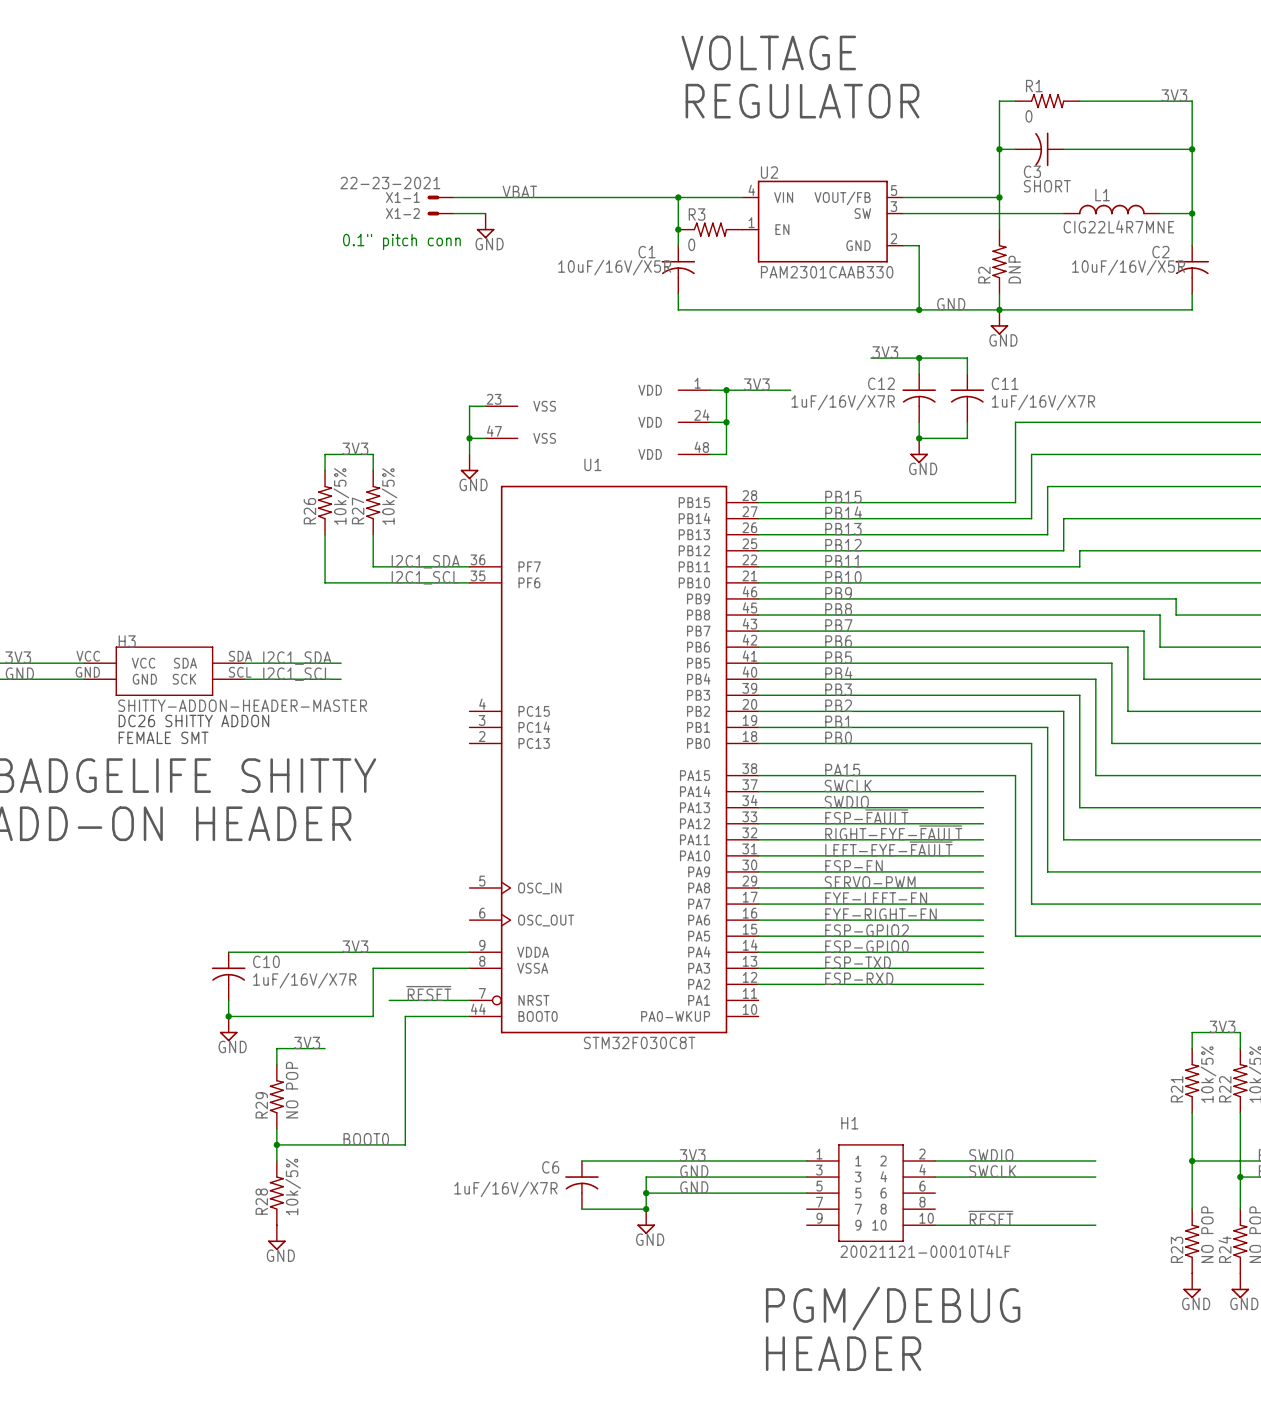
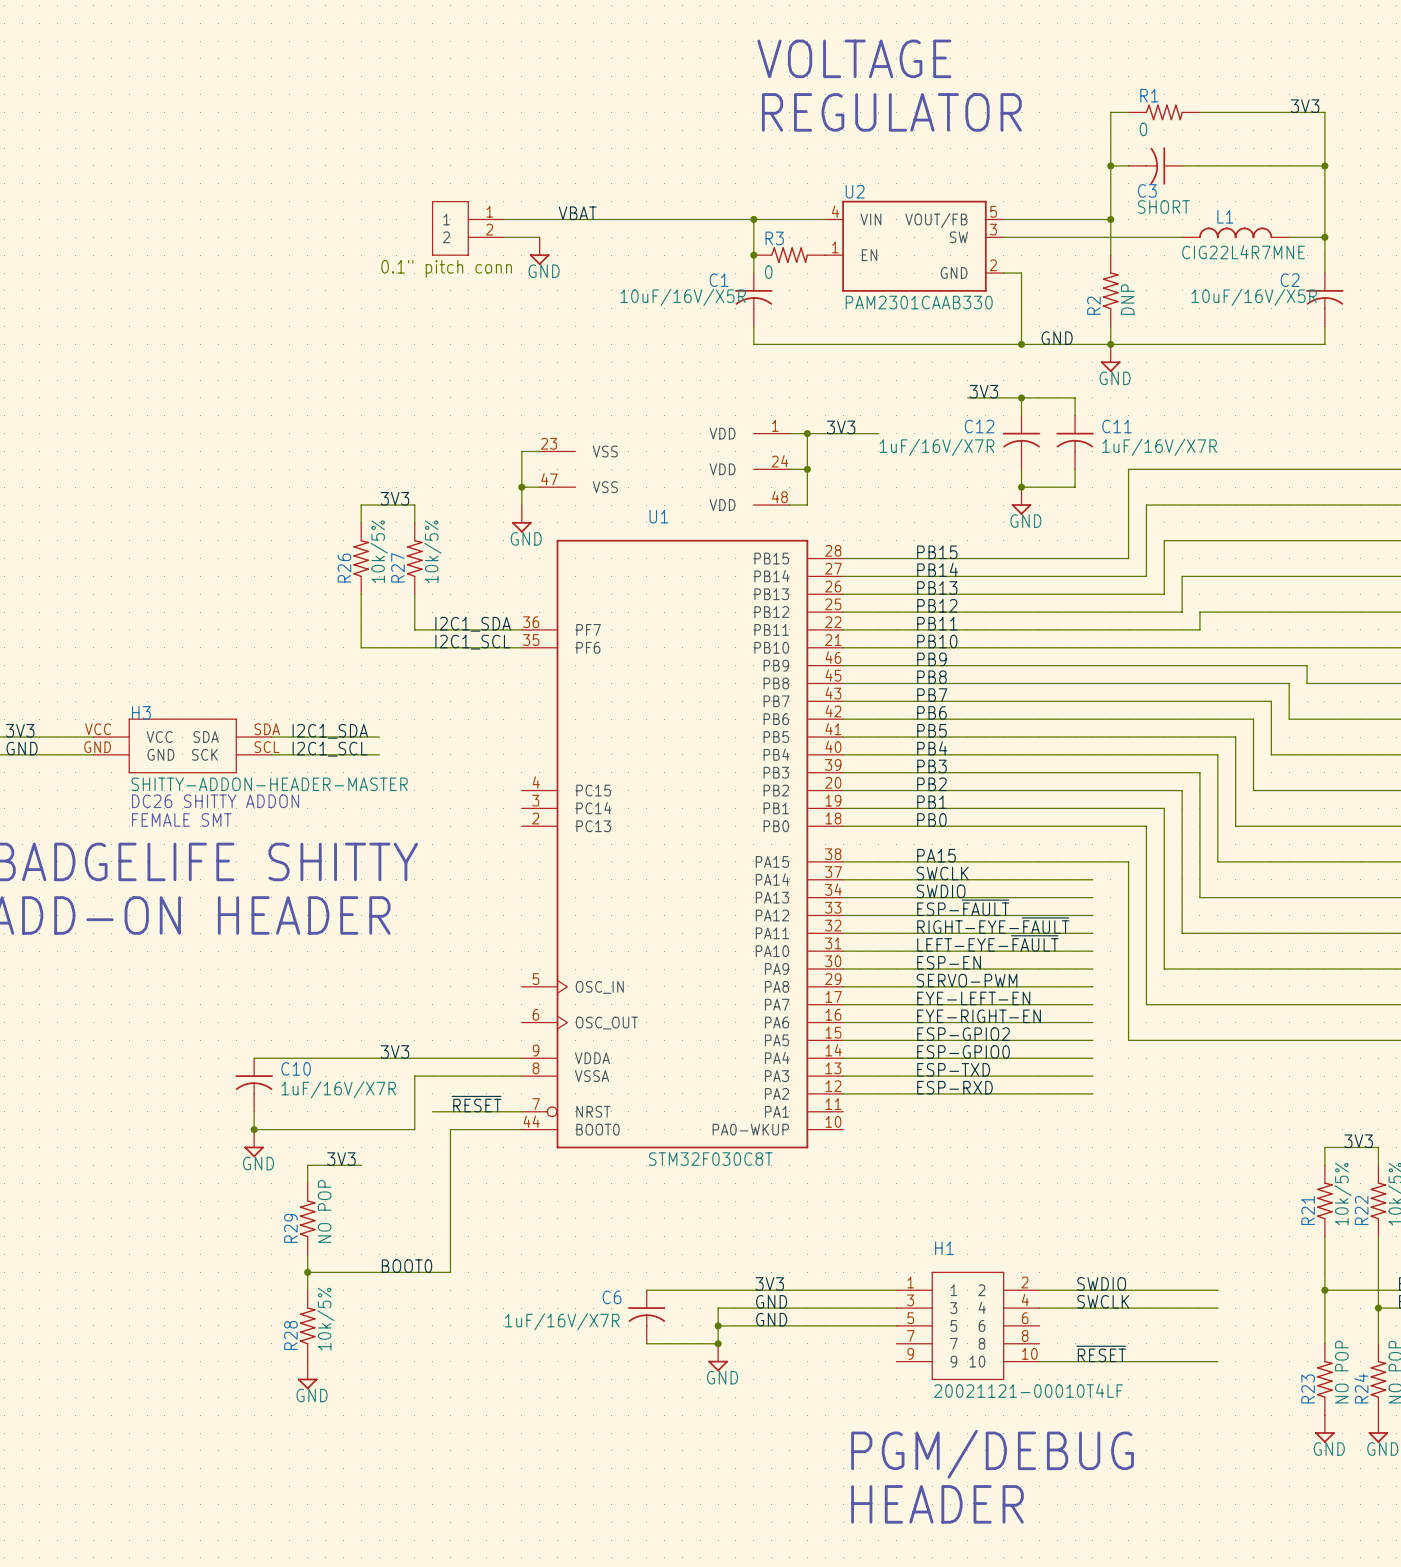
X1-1: 22-23-2021 (440, 197) -> none
part: none -> (468, 228)
X1-2: (440, 213) -> none

